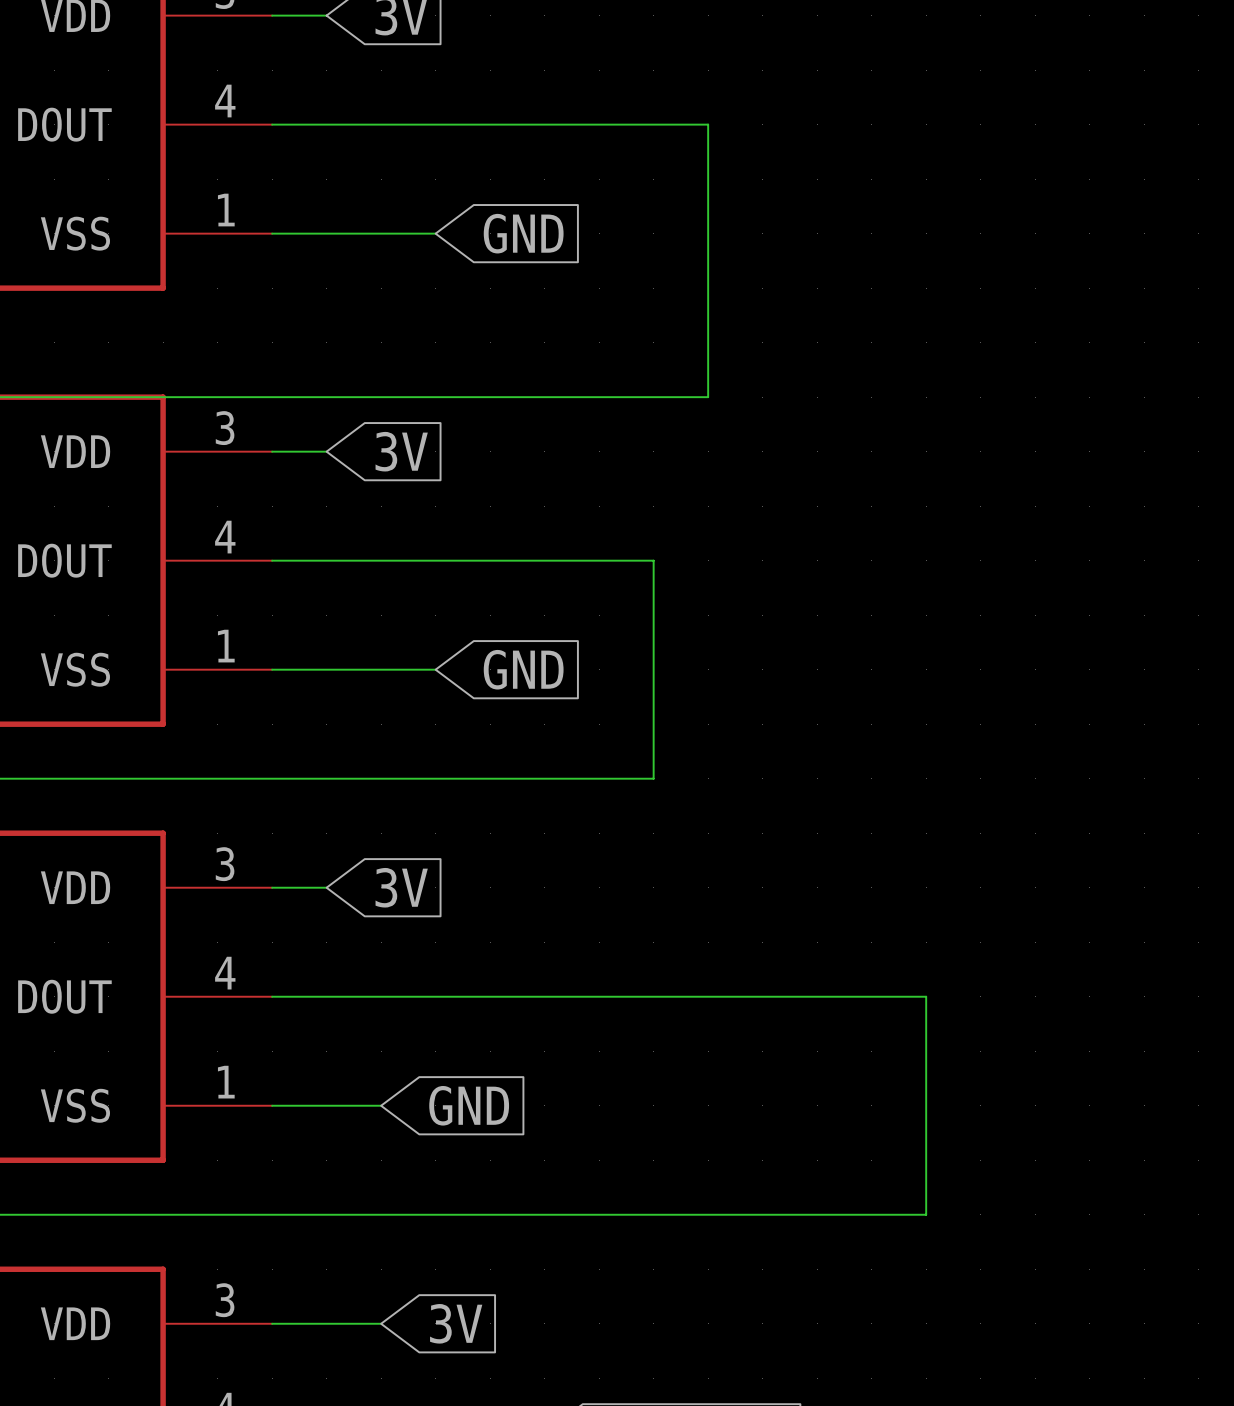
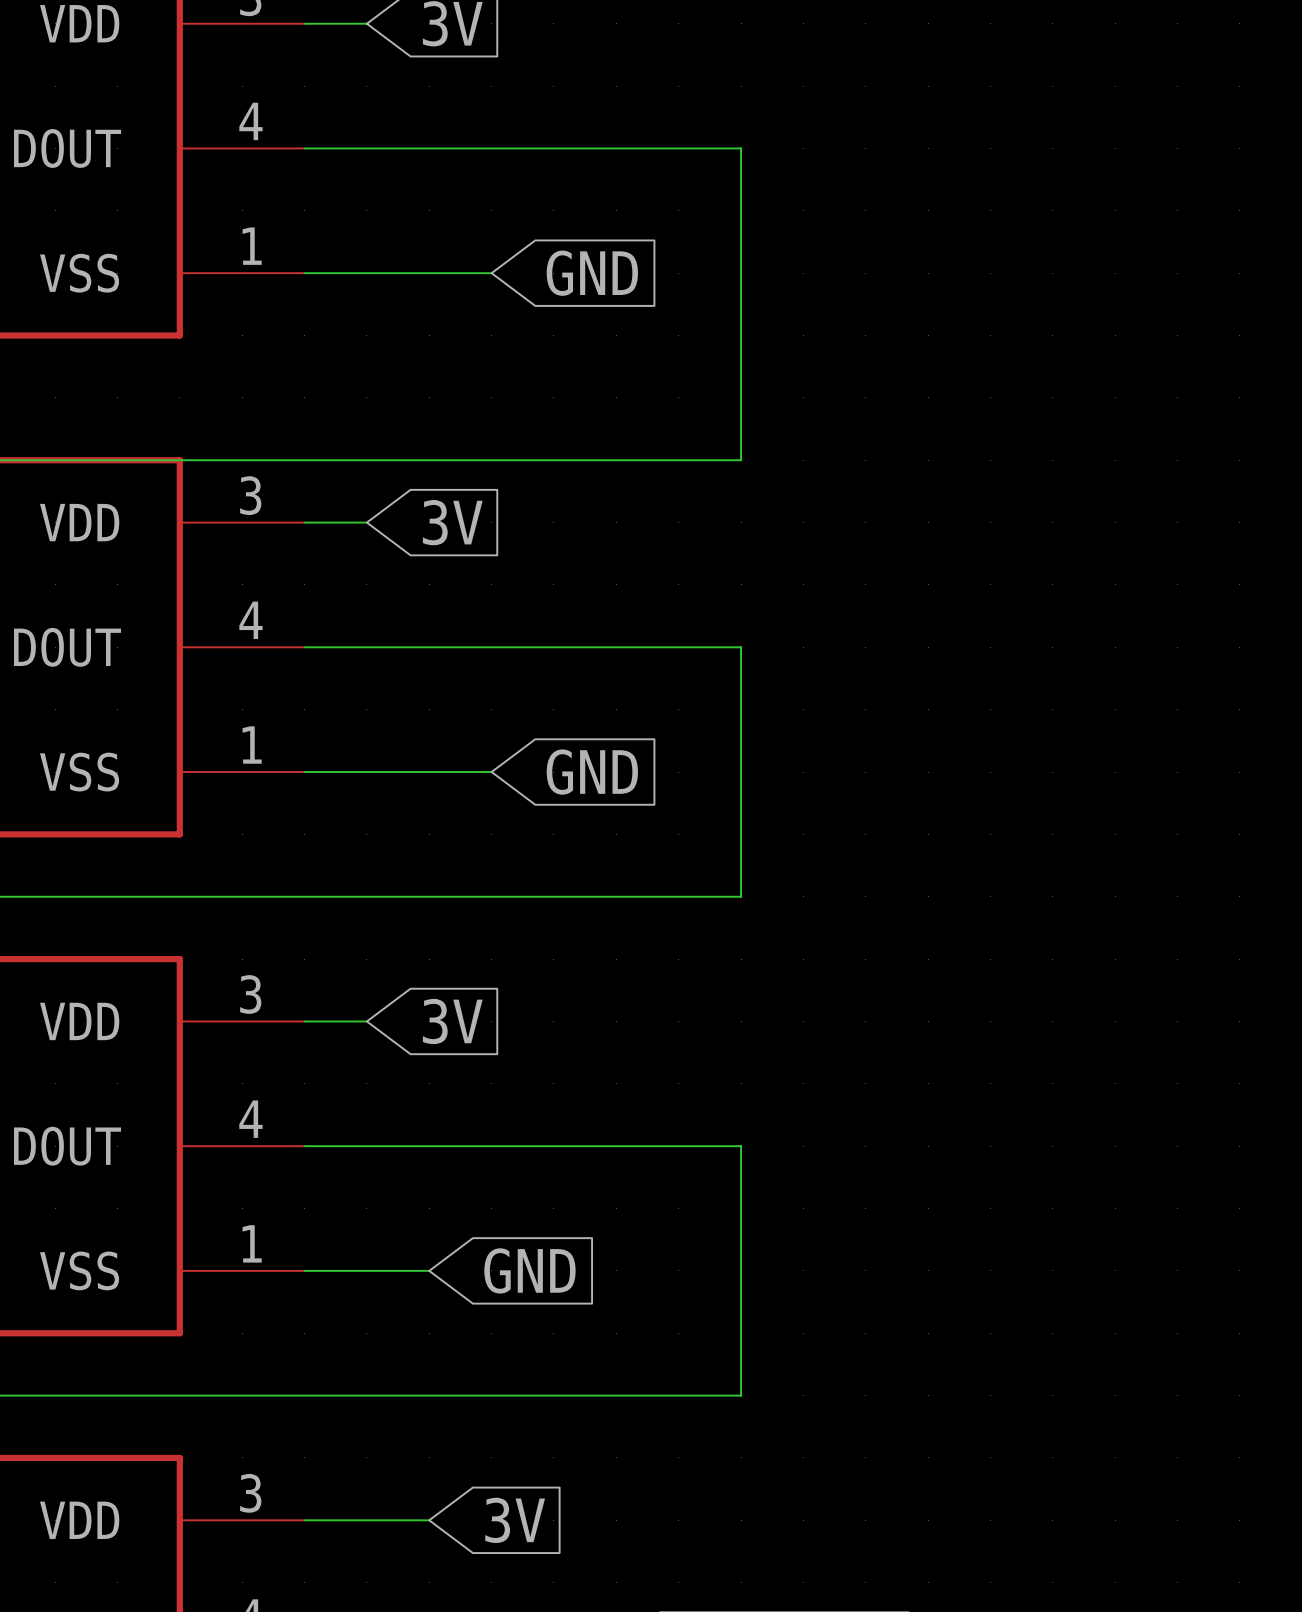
wire: (653, 124) (708, 124) (708, 397) (653, 397) -> (741, 148) (741, 460)
wire: (653, 996) (926, 996) (926, 1214) (653, 1214) -> (741, 1146) (741, 1395)

